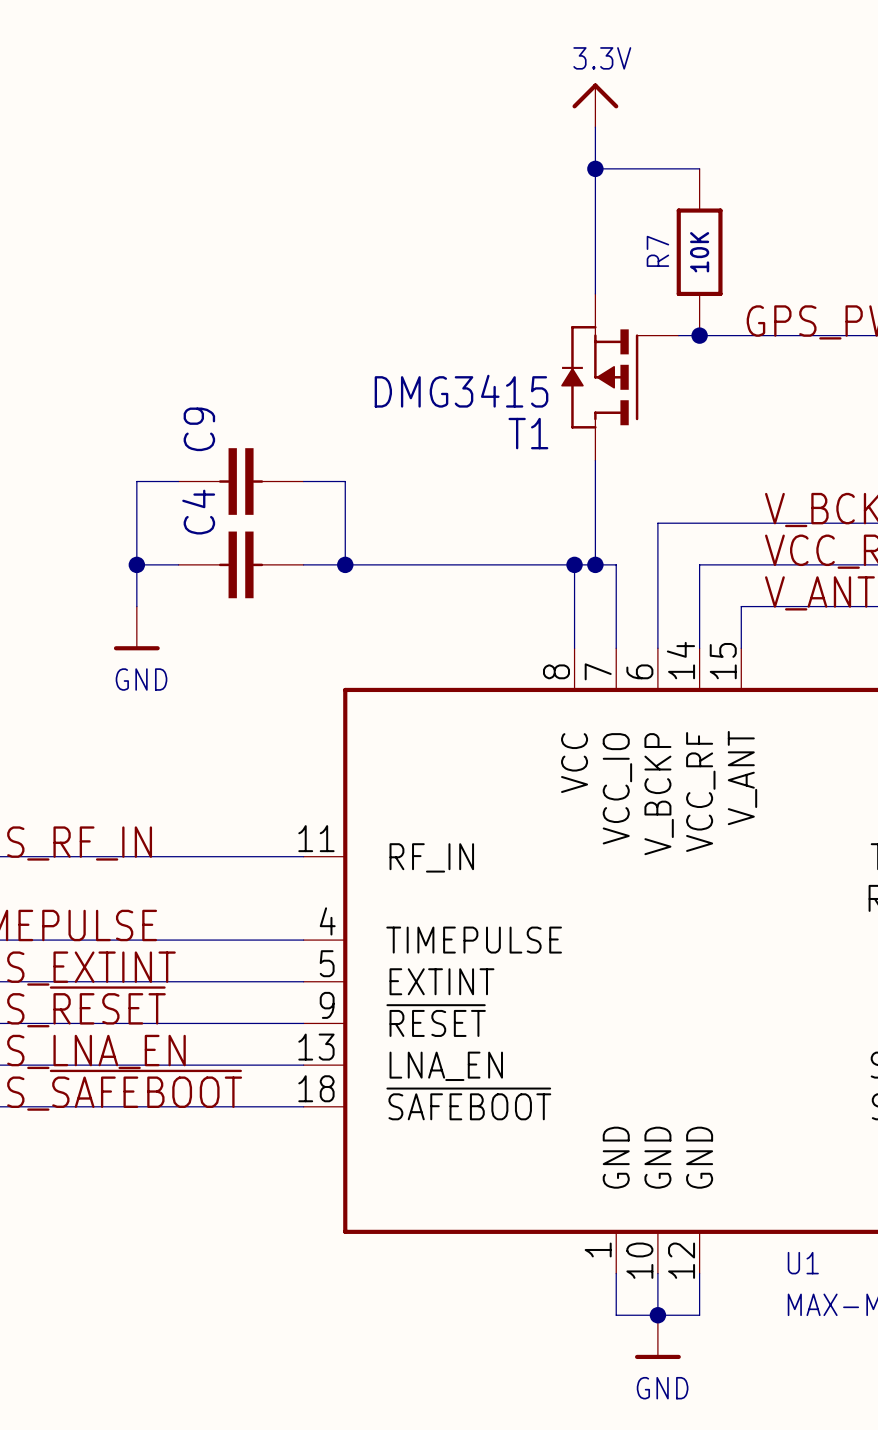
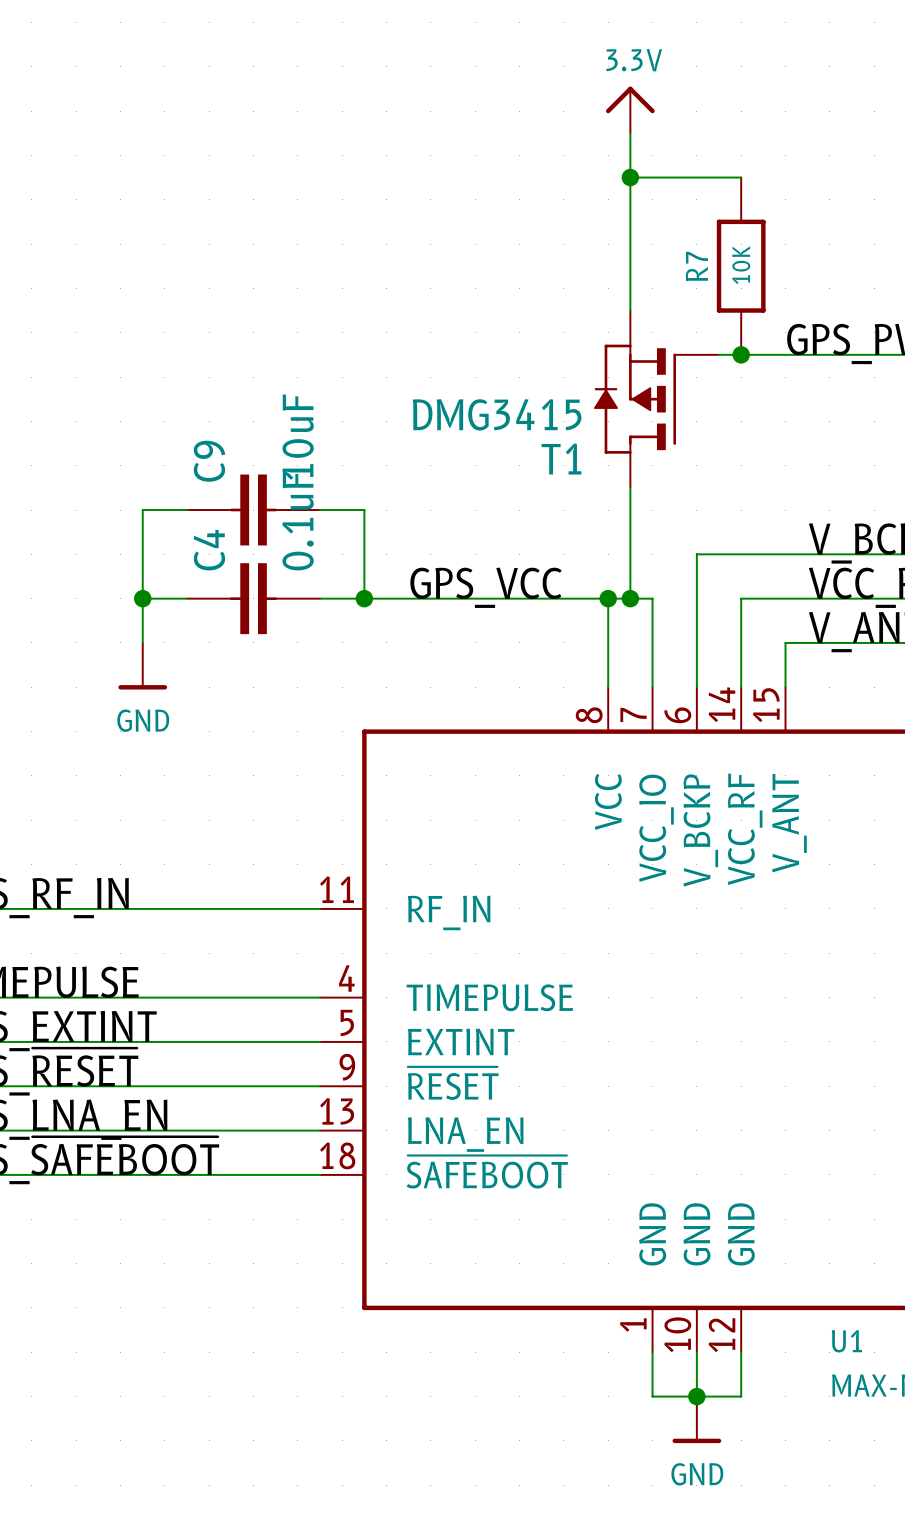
C9 value: none -> 10uF (298, 437)
C4 value: none -> 0.1uF (298, 521)
label: none -> GPS_VCC (485, 587)

